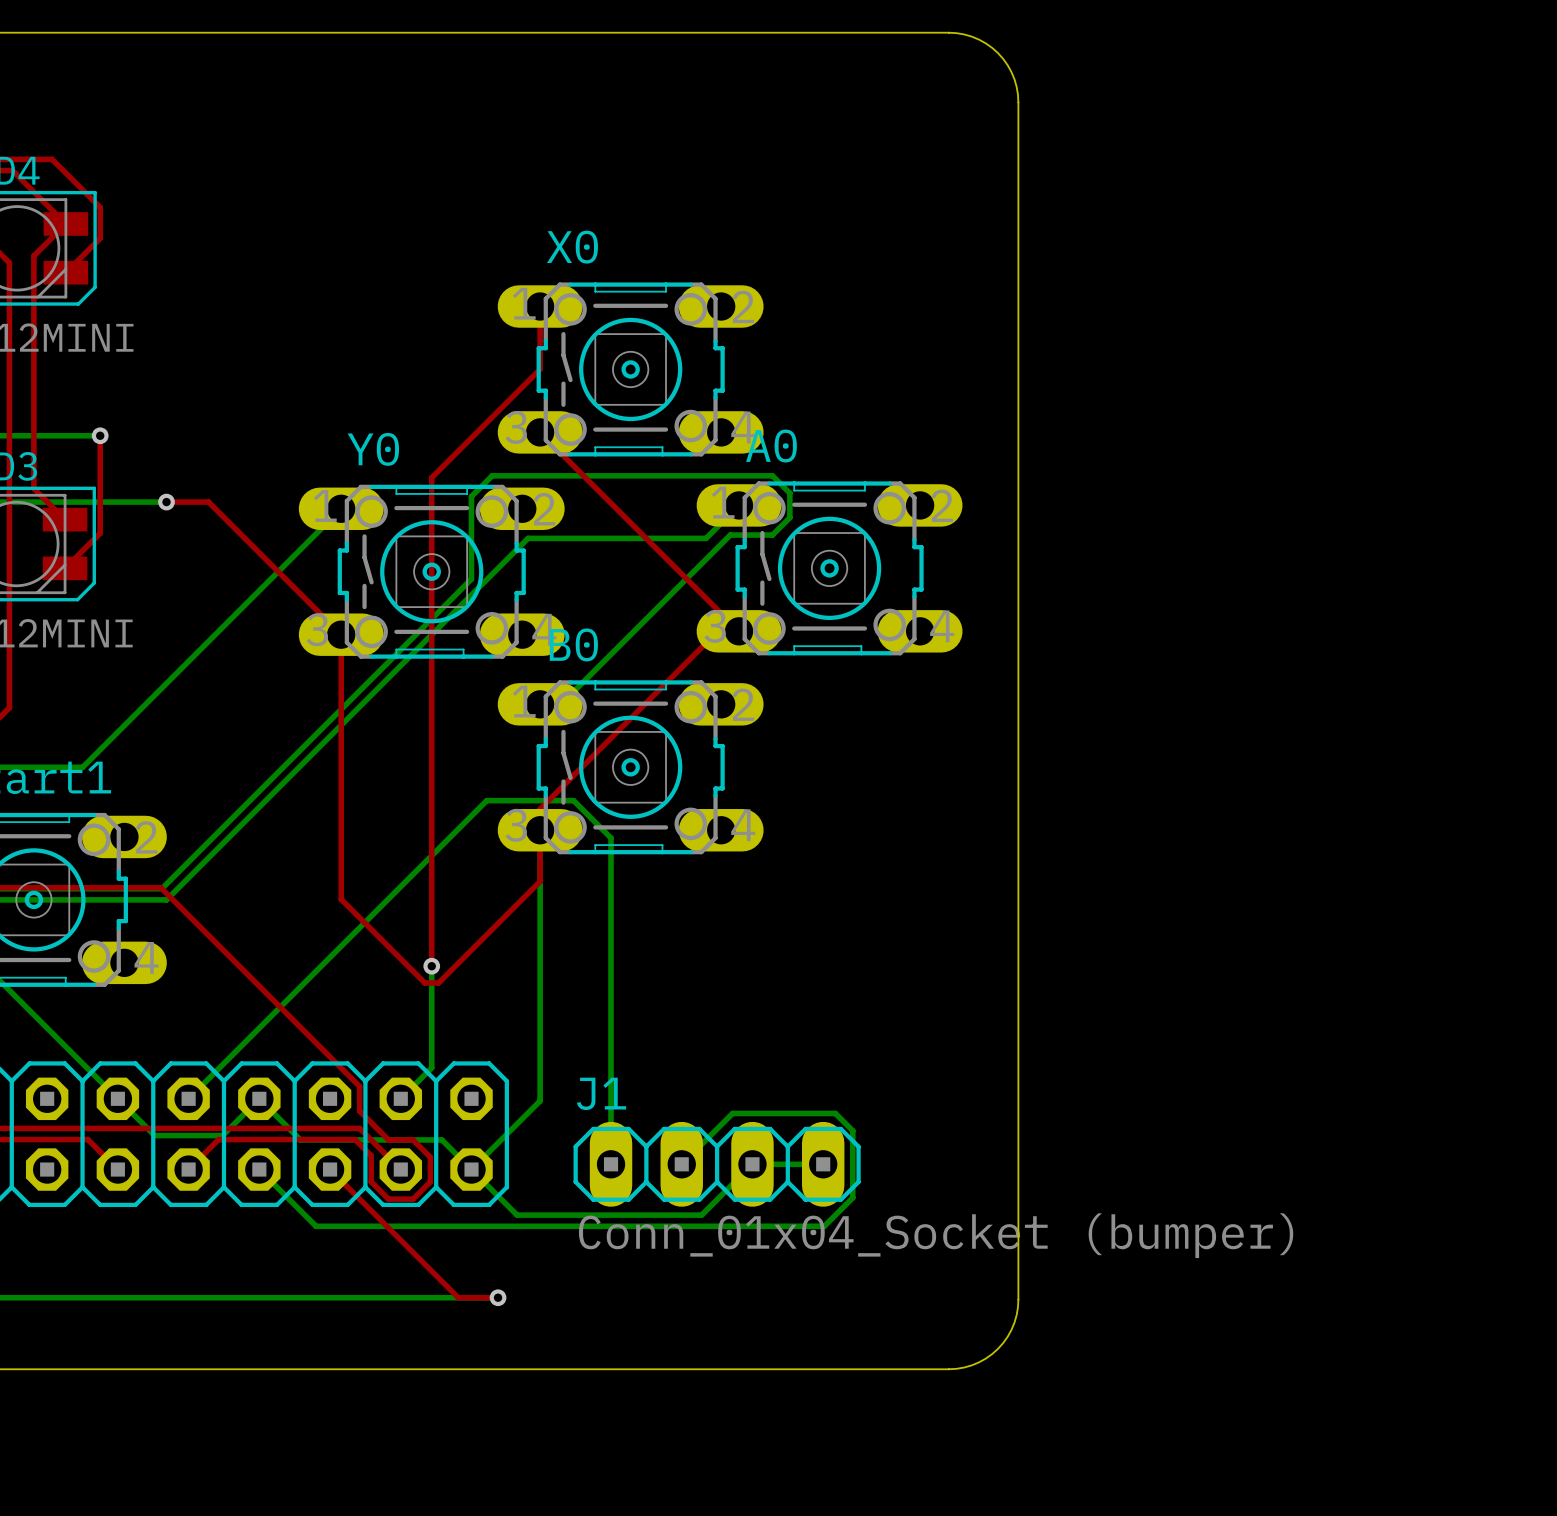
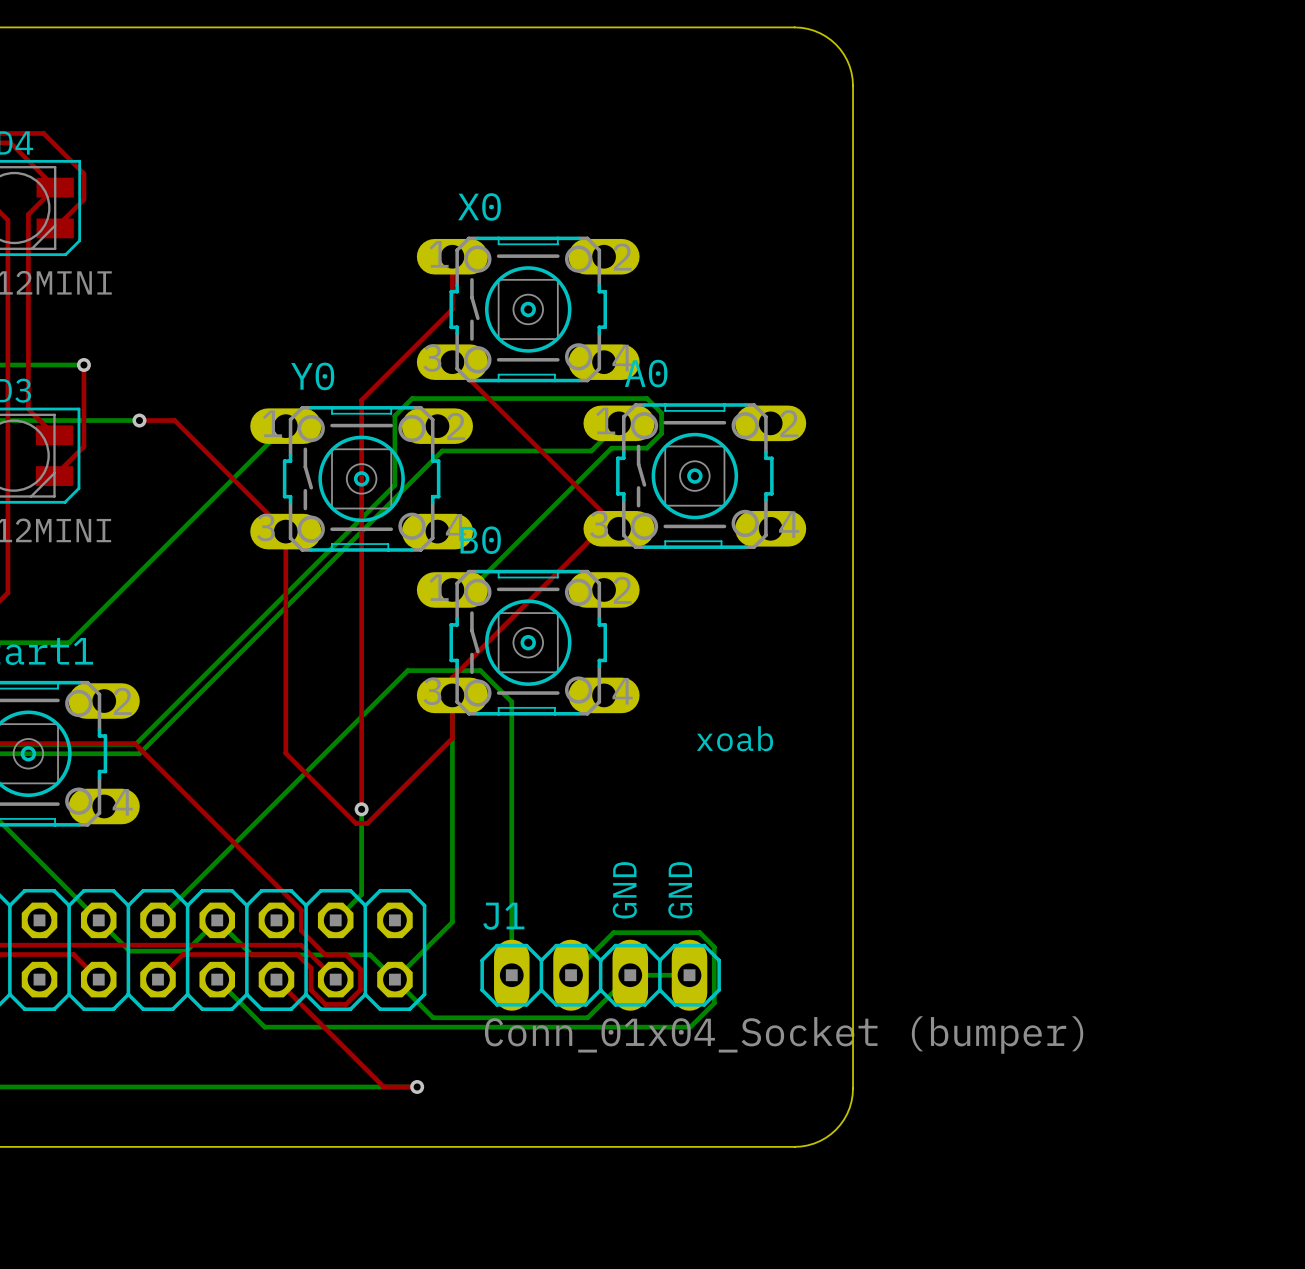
text: none -> xoab (734, 738)
text: none -> GND (624, 890)
text: none -> GND (680, 890)

